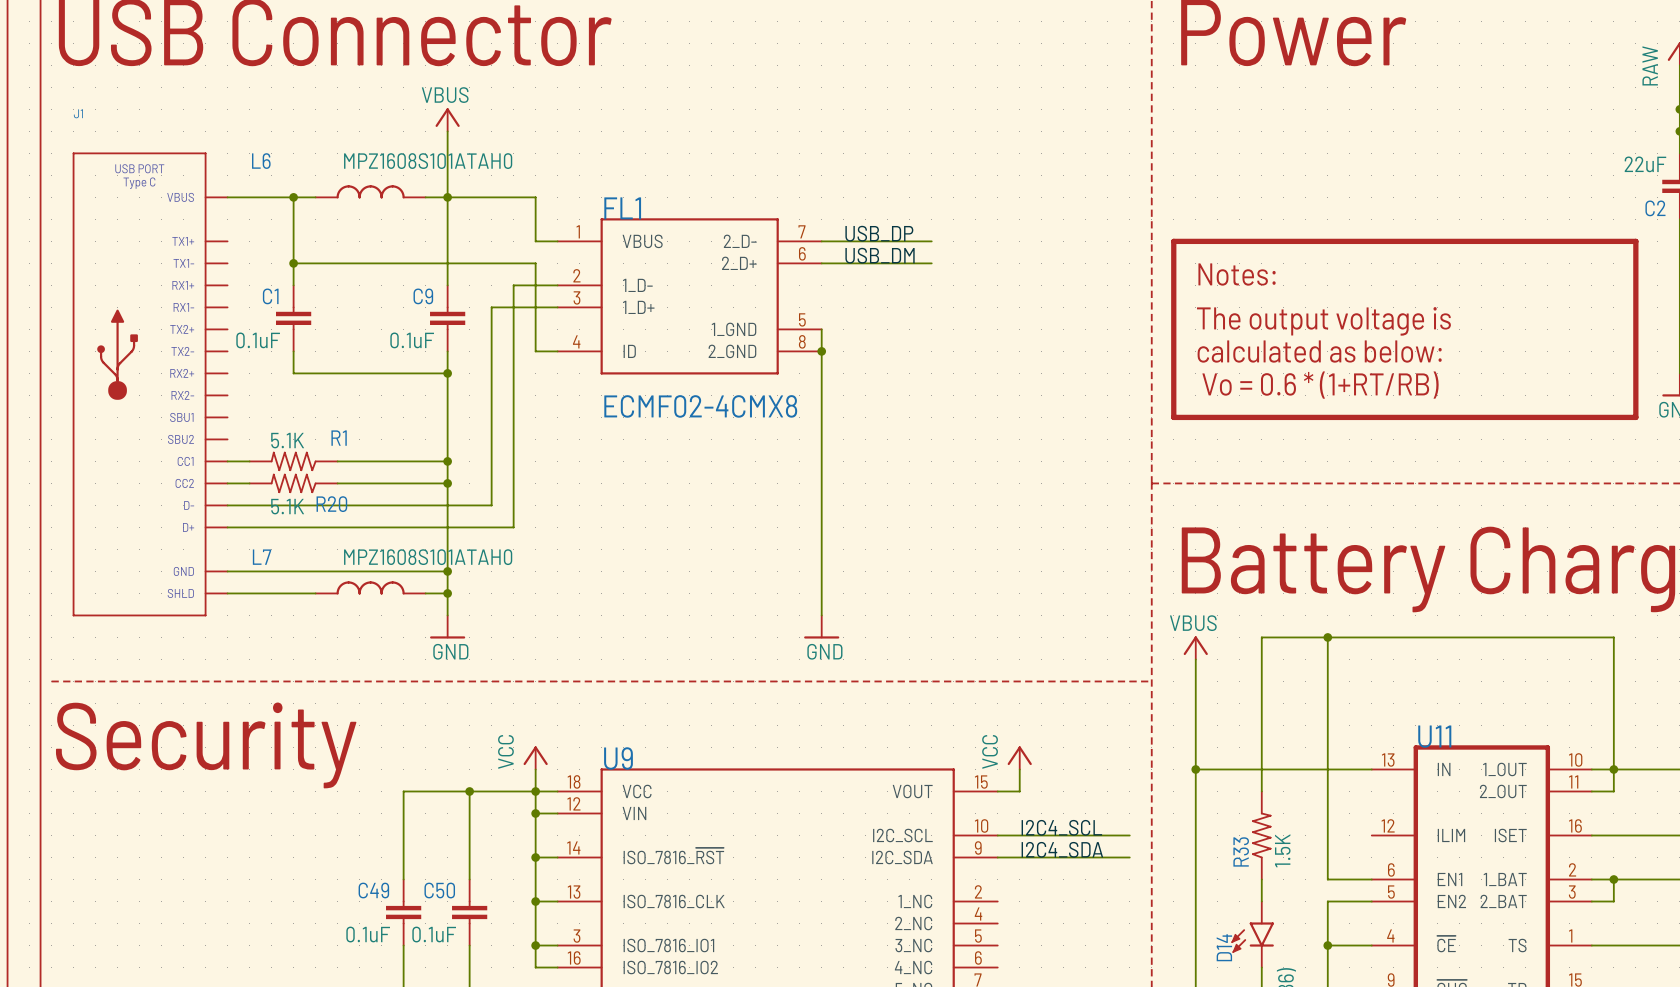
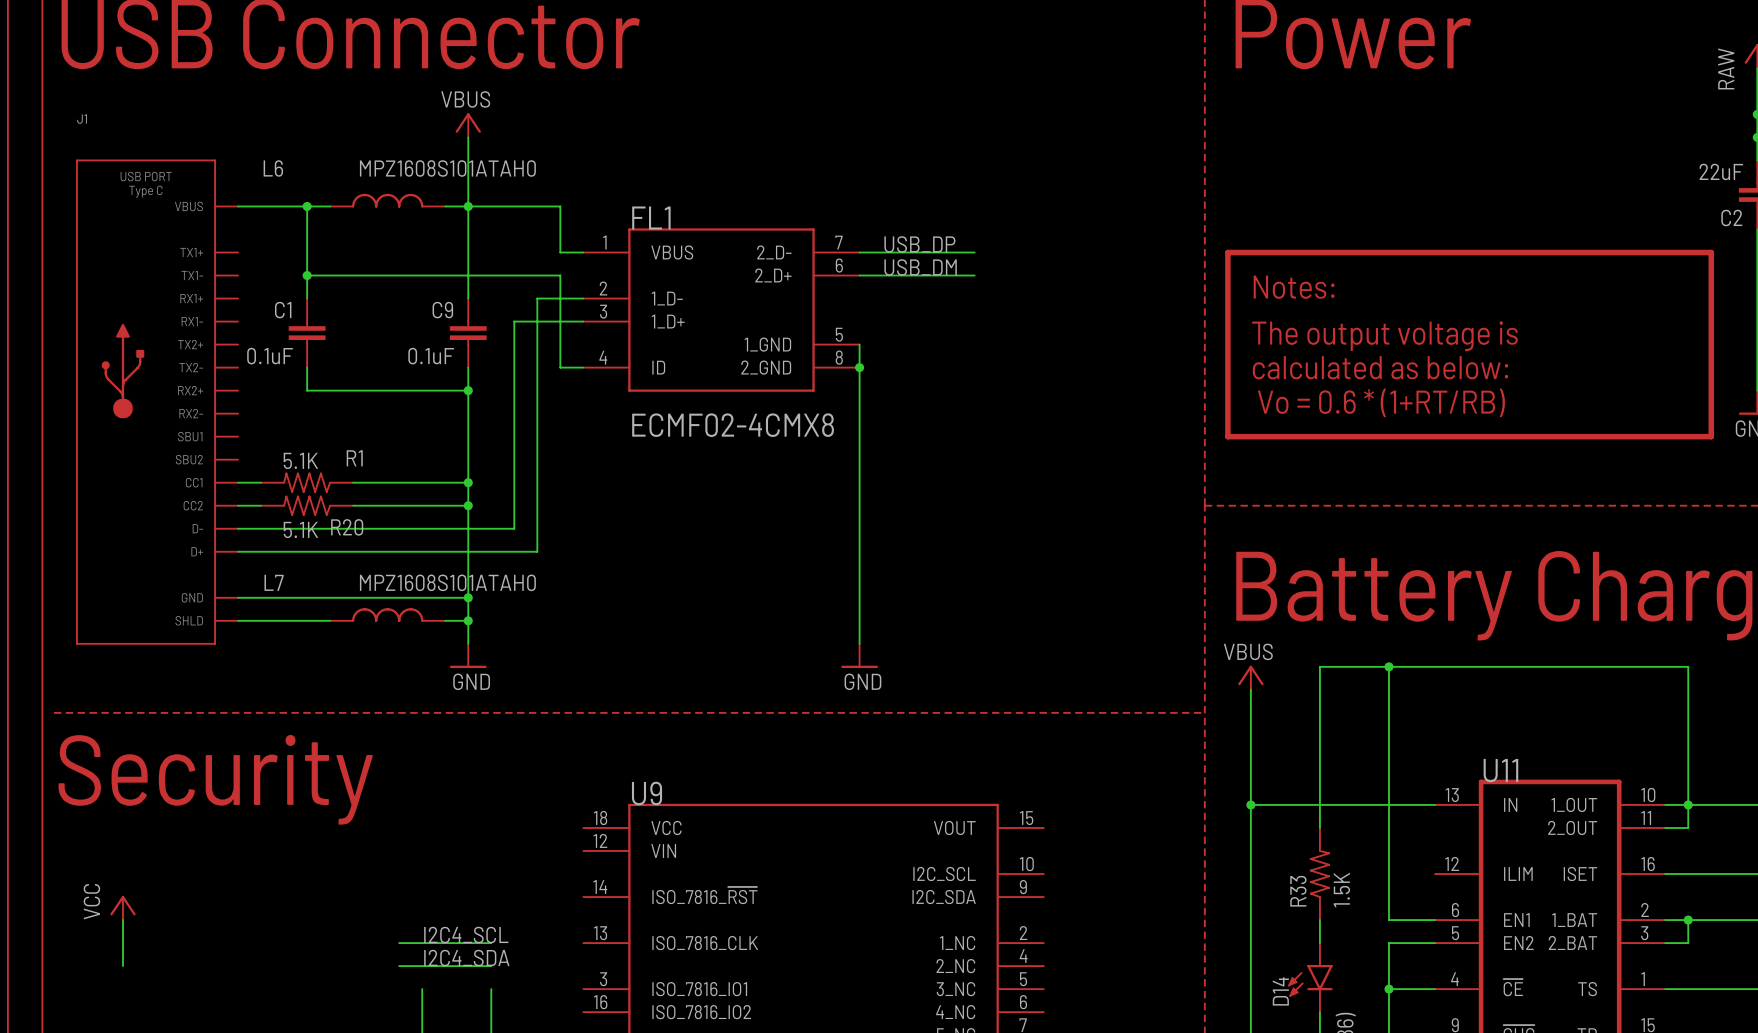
power symbol: VCC (535, 757) -> none
power symbol: VCC (1019, 757) -> none
wire: (535, 769) (535, 967) (557, 967) -> none
wire: (1019, 769) (1019, 791) (997, 791) -> none
wire: (469, 791) (469, 879) -> none
junction: (469, 791) -> none
junction: (535, 791) -> none
wire: (557, 791) (403, 791) (403, 879) -> none
wire: (535, 813) (557, 813) -> none
junction: (535, 813) -> none
label: I2C4_SCL (1061, 827) -> none
wire: (997, 835) (1129, 835) -> none
label: I2C4_SDA (1062, 849) -> none
wire: (535, 857) (557, 857) -> none
junction: (535, 857) -> none
wire: (997, 857) (1129, 857) -> none
power symbol: none -> VCC (122, 907)
wire: none -> (122, 920) (122, 966)
label: none -> I2C4_SCL (466, 935)
wire: none -> (399, 943) (491, 943)
wire: (535, 901) (557, 901) -> none
junction: (535, 901) -> none
C49: 0.1uF (403, 912) -> none
C50: 0.1uF (469, 912) -> none
label: none -> I2C4_SDA (466, 958)
wire: none -> (399, 966) (491, 966)
wire: (535, 945) (557, 945) -> none
junction: (535, 945) -> none

